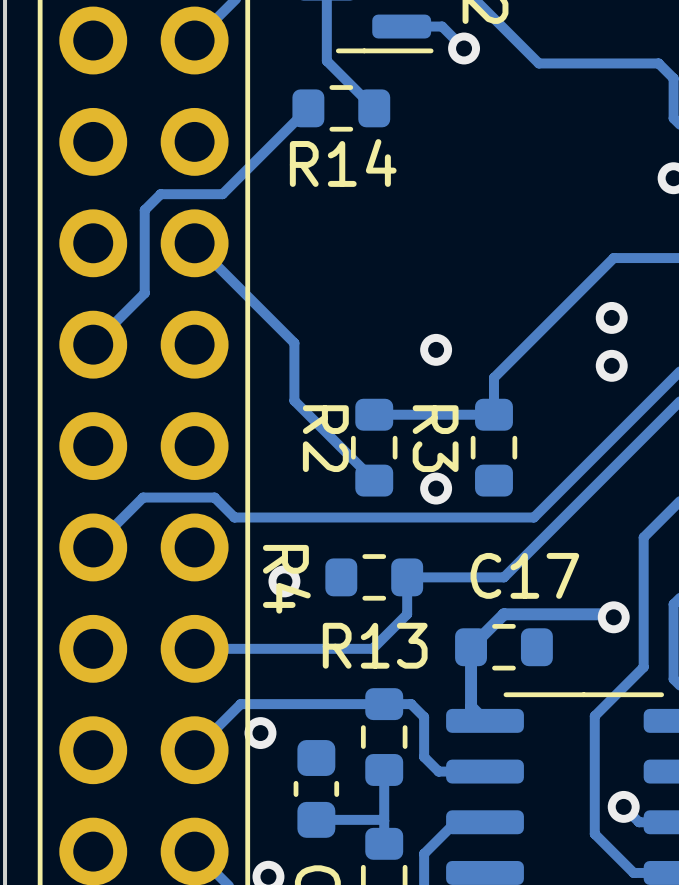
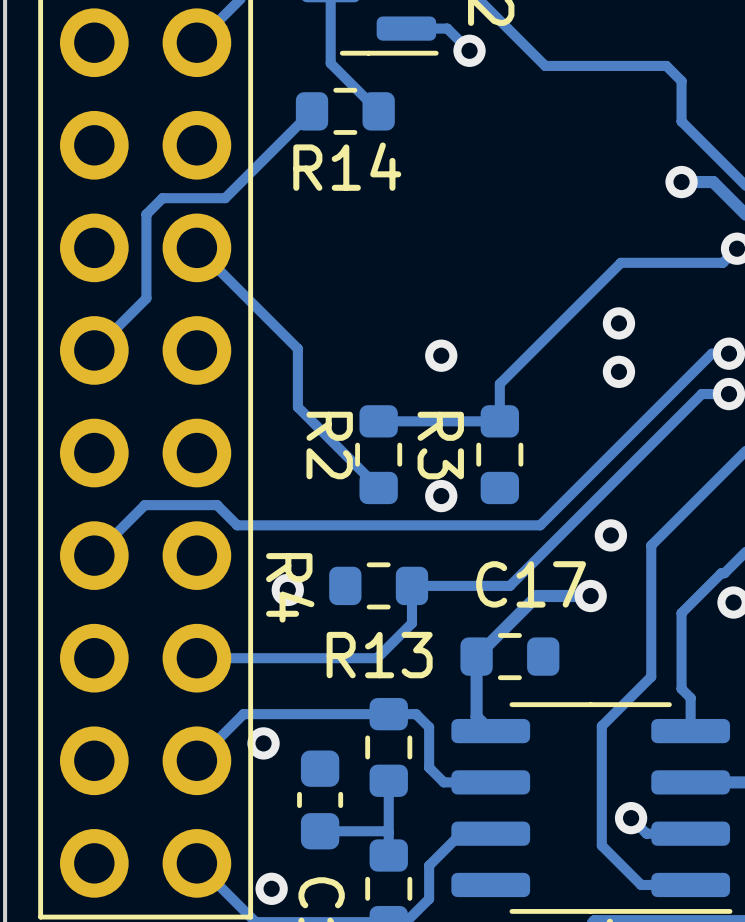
via: none -> (610, 535)
track: (503, 614) (610, 614) (613, 617) -> (509, 623) (537, 596) (590, 596)
via position: (613, 617) -> (590, 596)

